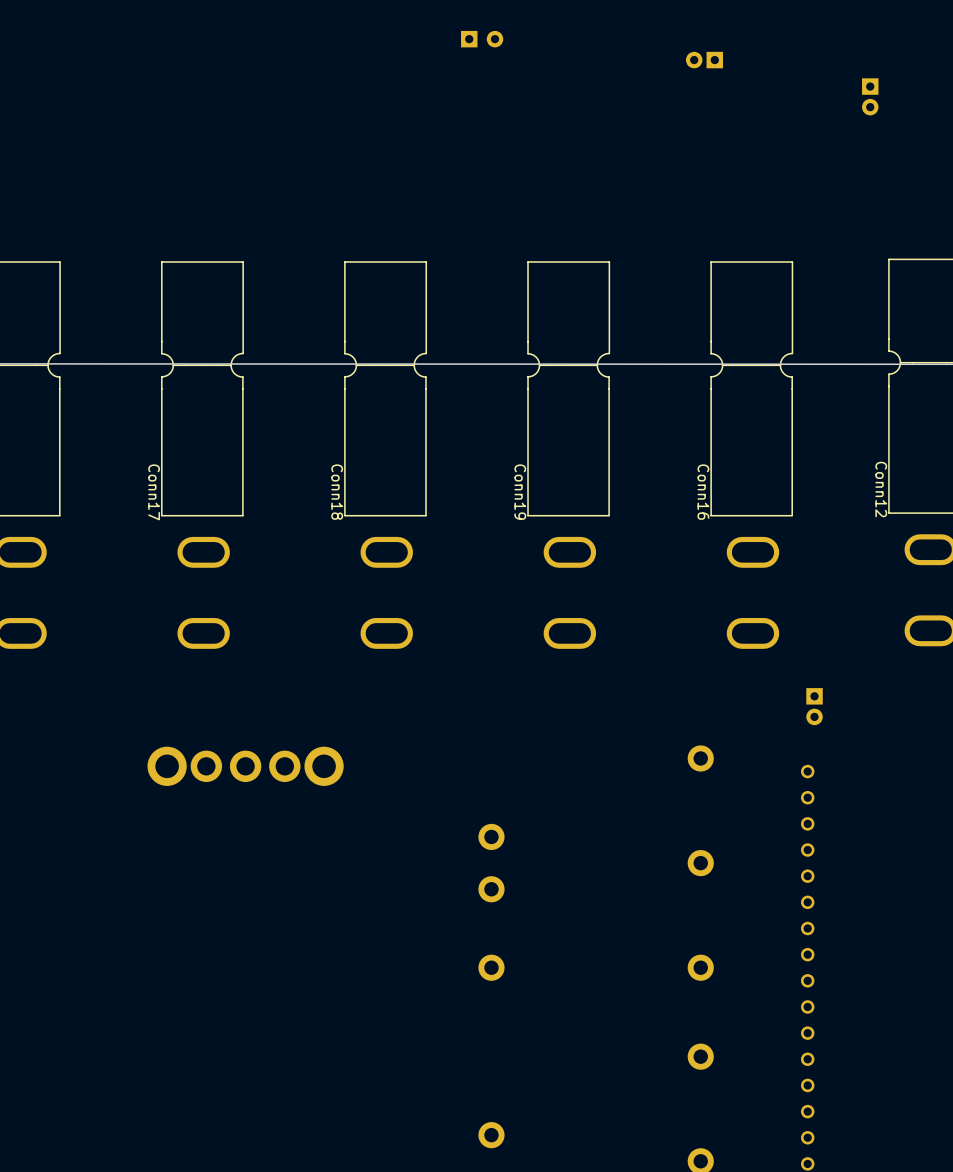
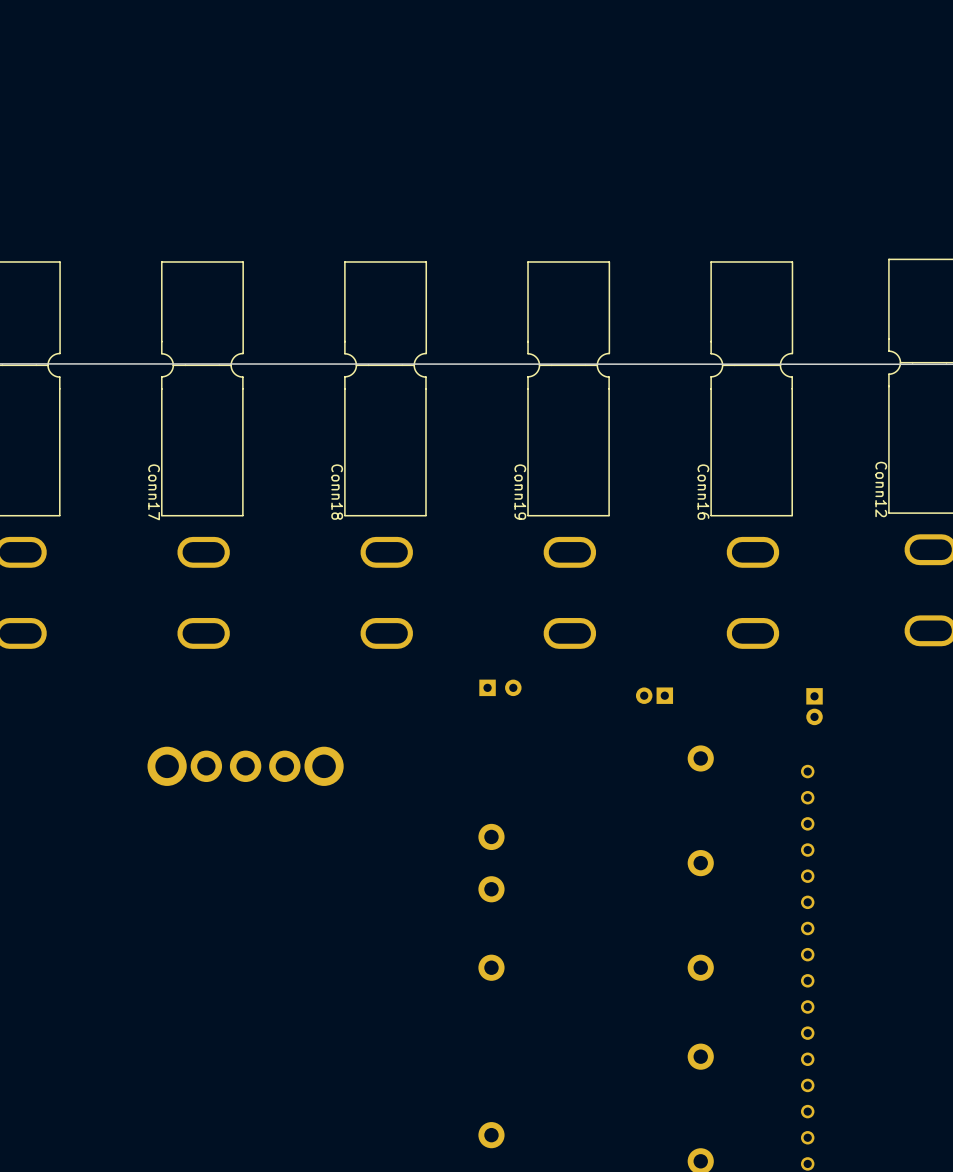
part: (482, 39) -> none
part: (704, 60) -> none
part: (870, 96) -> none
part: none -> (500, 687)
part: none -> (654, 695)

